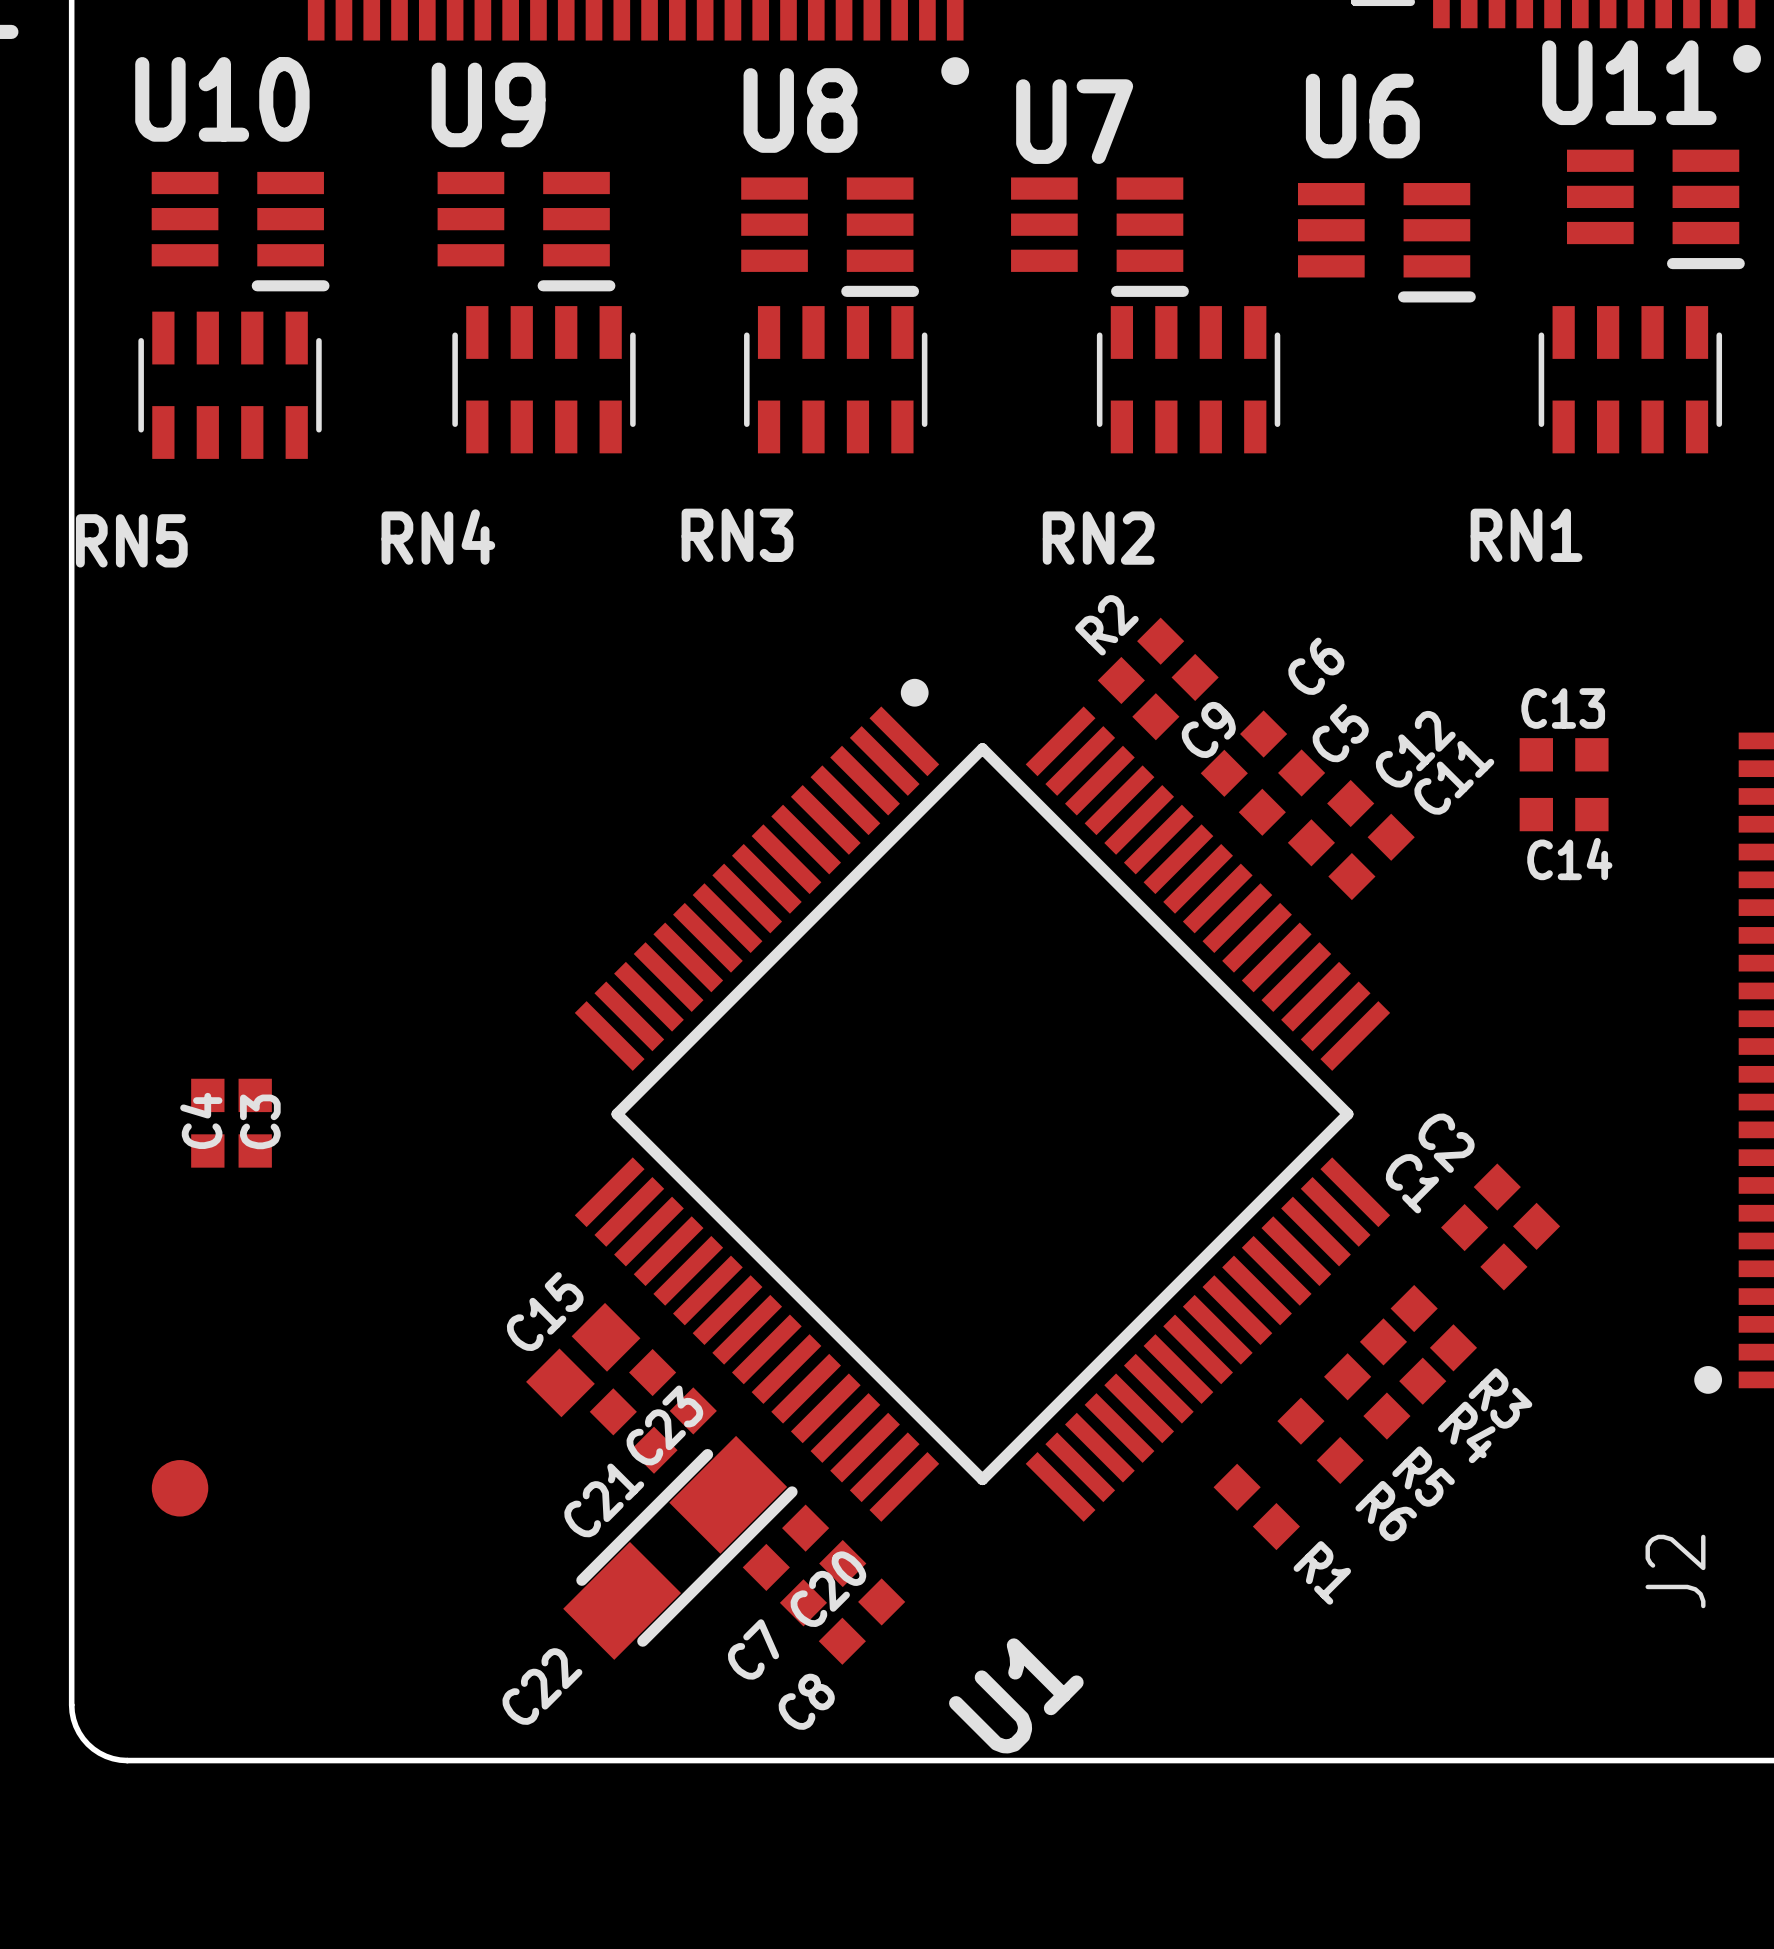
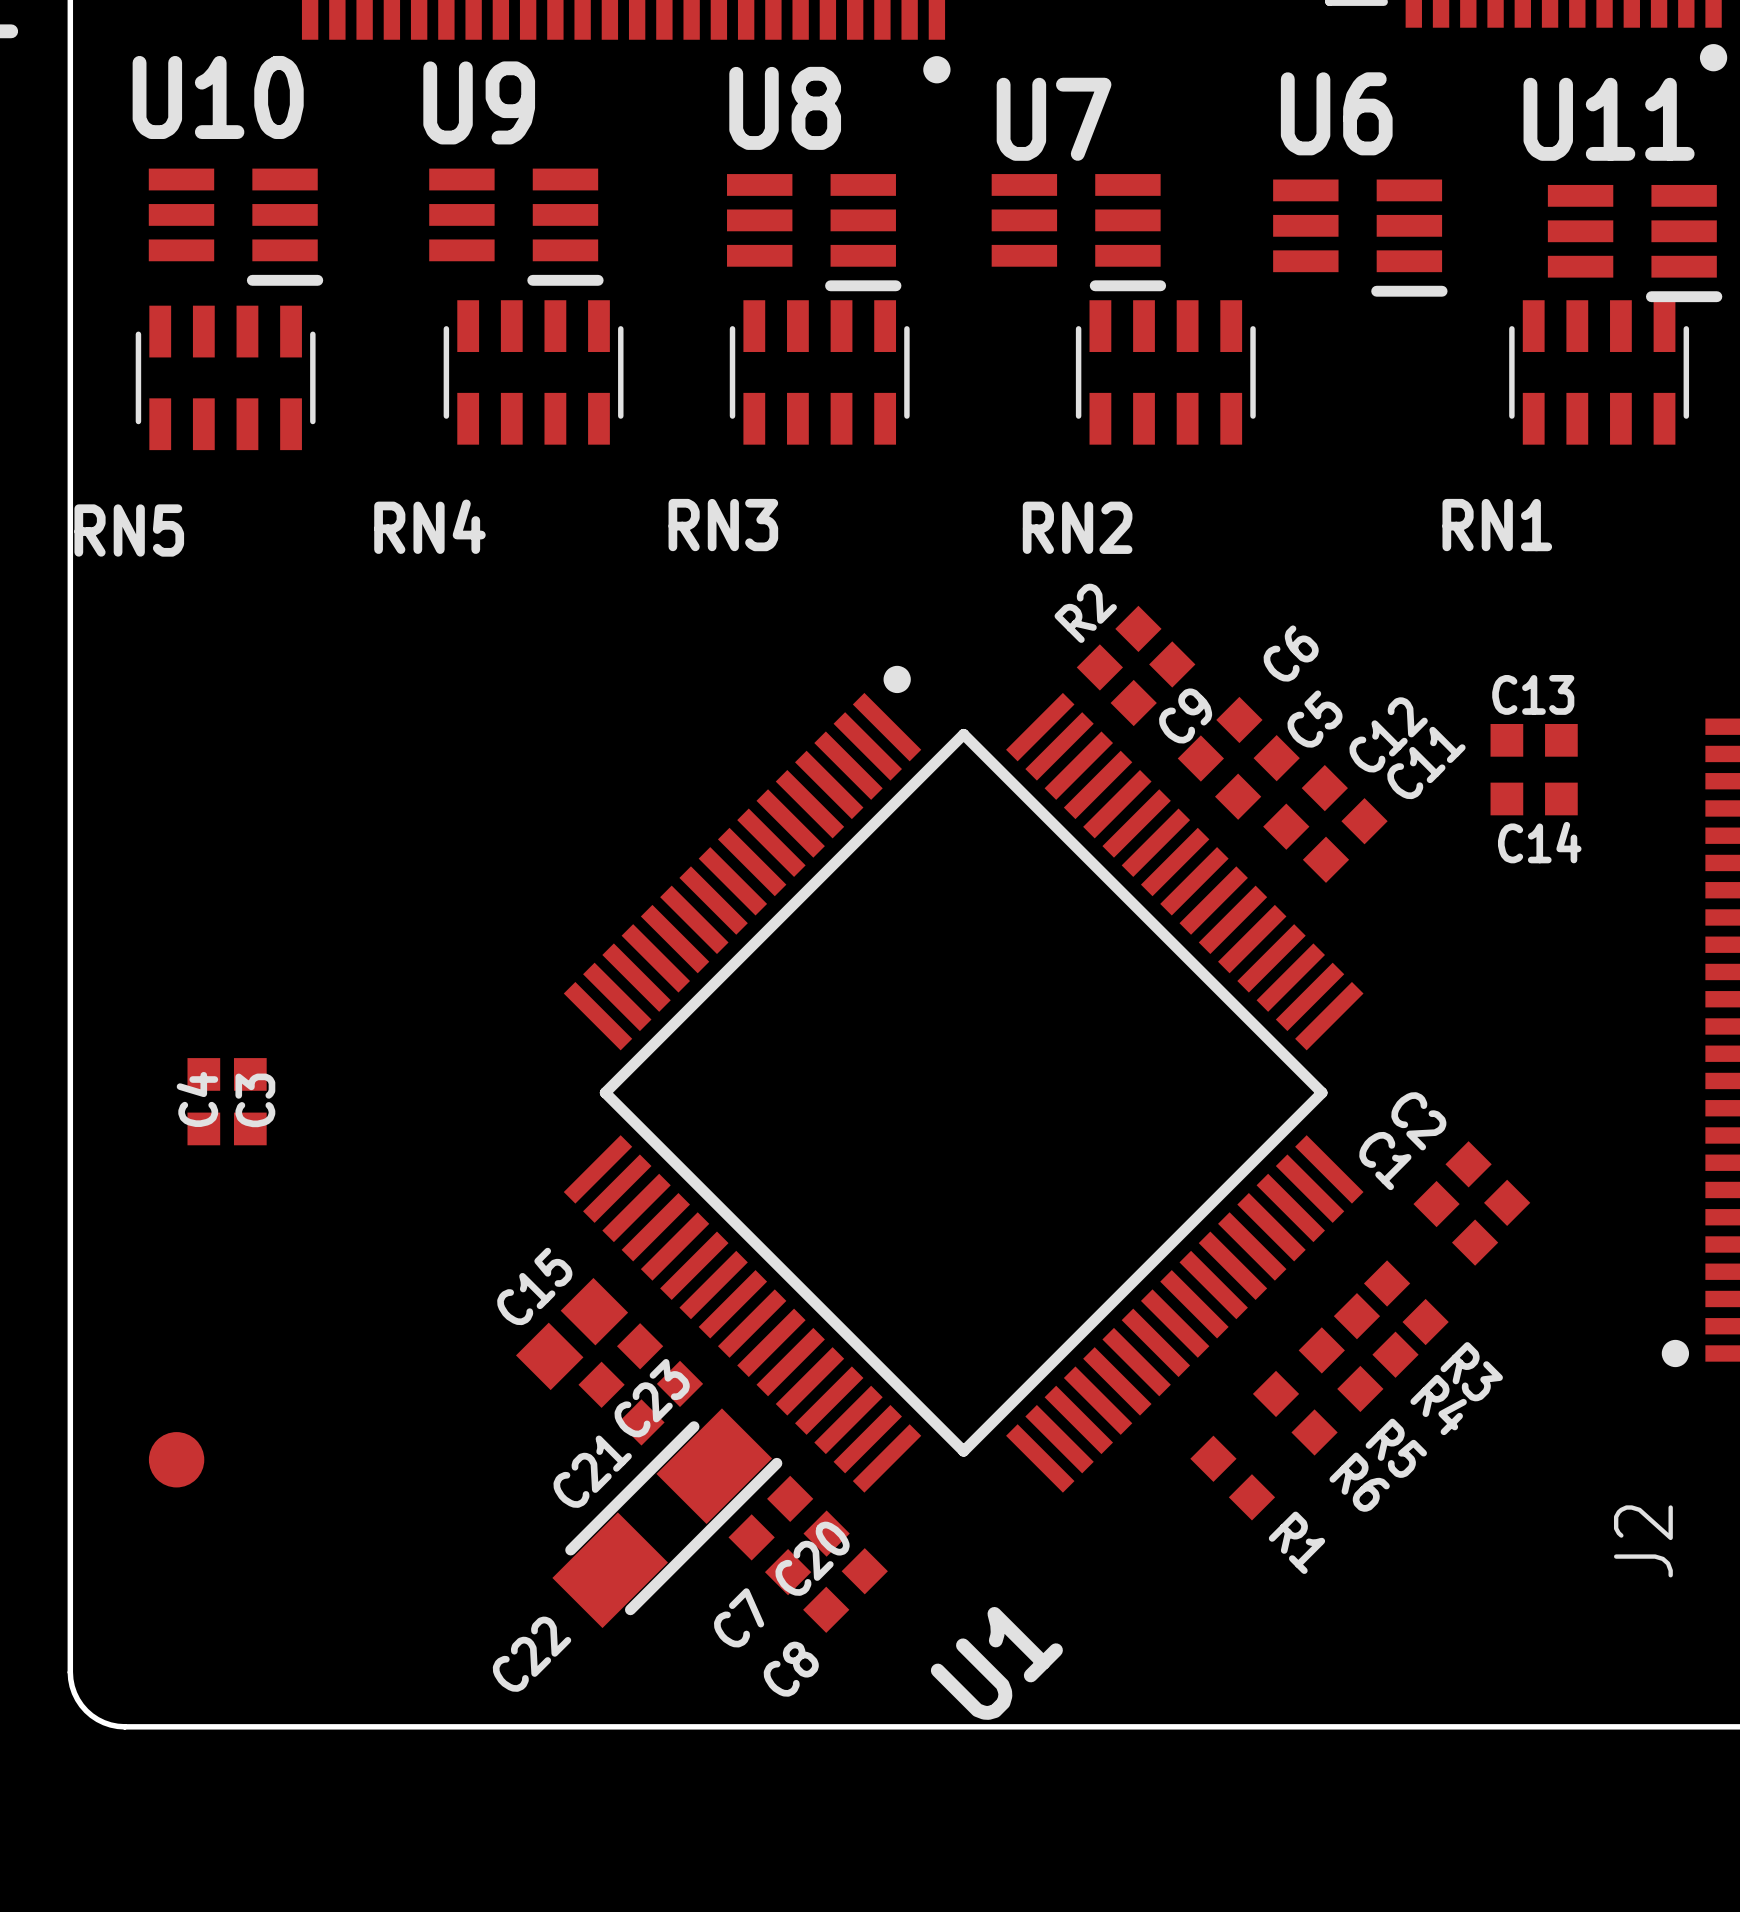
U11 position: (1655, 209) -> (1635, 243)

